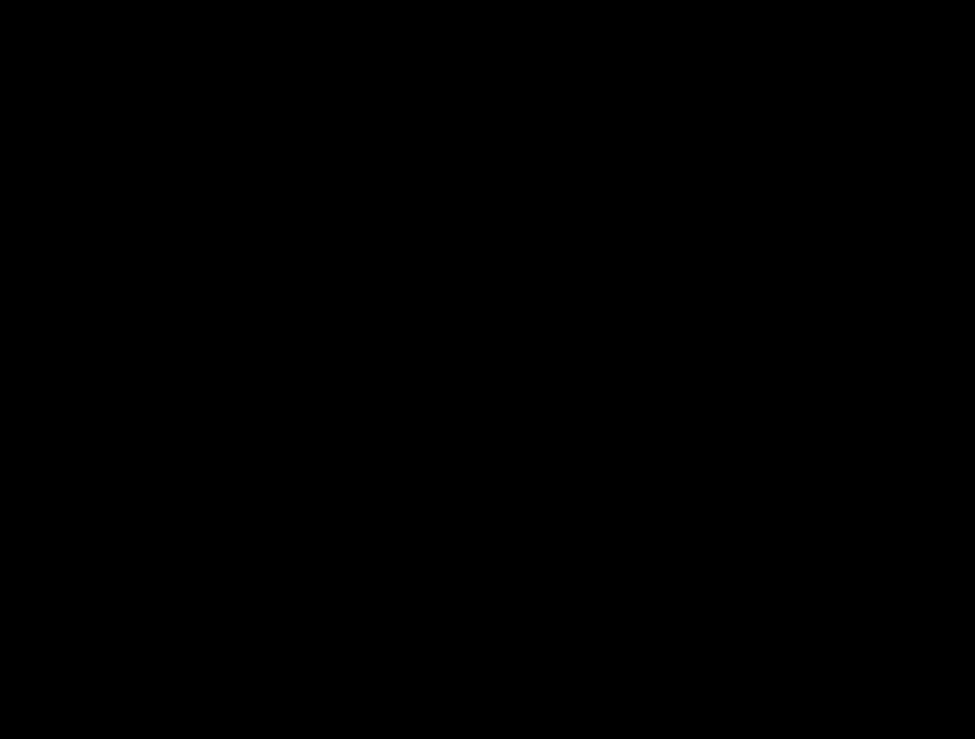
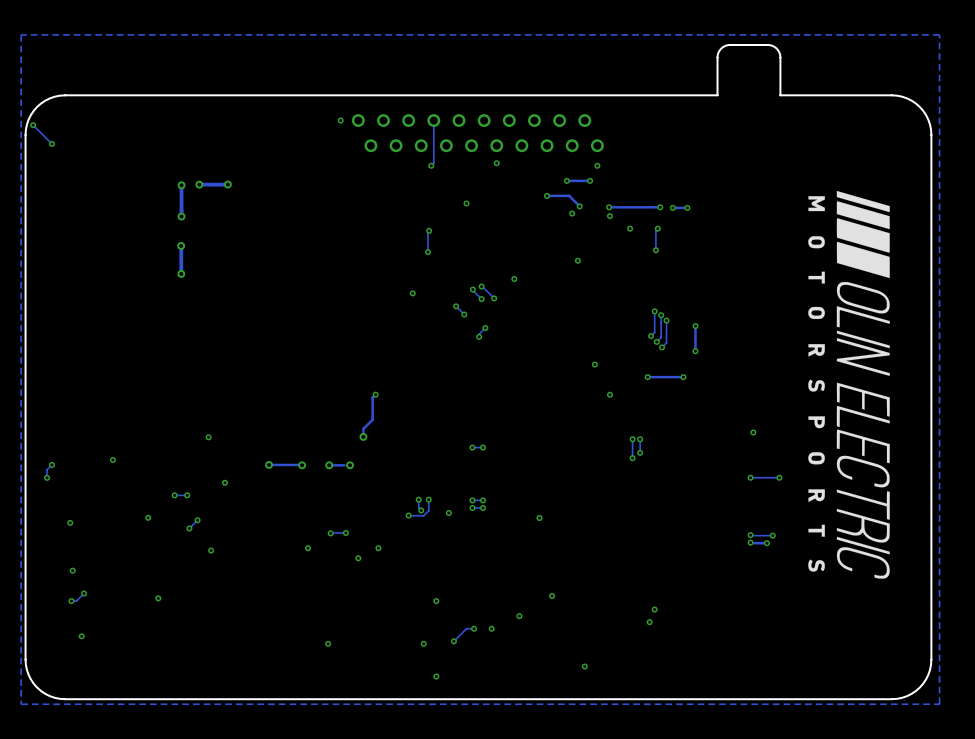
zone outline: none -> (939, 34) (939, 704) (21, 704) (21, 34) (939, 34)
board edge: none -> (767, 44) (728, 45) (721, 48) (717, 55) (717, 95) (65, 95) (50, 98) (41, 103) (30, 115) (25, 134) (25, 659) (28, 674) (33, 683) (50, 696) (65, 699) (891, 699) (902, 697) (915, 691) (928, 674) (931, 659) (930, 124) (919, 106) (911, 100) (896, 95) (780, 95) (779, 54) (775, 47) (767, 44)
via: none -> (340, 120)
track: none -> (433, 120) (433, 163) (431, 165)
track: none -> (33, 125) (51, 143)
via: none -> (33, 125)
part: none -> (477, 133)
via: none -> (51, 143)
via: none -> (496, 163)
via: none -> (431, 165)
via: none -> (597, 165)
via: none -> (566, 180)
track: none -> (590, 180) (566, 180)
via: none -> (590, 180)
via: none -> (199, 184)
track: none -> (227, 184) (199, 184)
via: none -> (227, 184)
track: none -> (181, 185) (181, 216)
via: none -> (181, 185)
drawing: none -> [808, 190, 890, 579]
track: none -> (547, 195) (569, 195) (579, 206)
via: none -> (547, 195)
via: none -> (466, 203)
via: none -> (579, 206)
via: none -> (609, 207)
track: none -> (660, 207) (609, 207)
via: none -> (660, 207)
via: none -> (672, 207)
track: none -> (687, 207) (672, 207)
via: none -> (687, 207)
via: none -> (572, 213)
via: none -> (181, 216)
via: none -> (609, 216)
via: none -> (630, 228)
track: none -> (657, 228) (655, 230) (655, 250)
via: none -> (657, 228)
track: none -> (429, 230) (427, 252)
via: none -> (429, 230)
via: none -> (181, 245)
track: none -> (181, 246) (181, 273)
via: none -> (655, 250)
via: none -> (427, 252)
via: none -> (577, 260)
via: none -> (181, 273)
via: none -> (514, 279)
track: none -> (481, 286) (494, 298)
via: none -> (481, 286)
track: none -> (472, 289) (481, 299)
via: none -> (472, 289)
via: none -> (412, 293)
via: none -> (494, 298)
via: none -> (481, 299)
track: none -> (456, 306) (464, 314)
via: none -> (456, 306)
track: none -> (654, 311) (654, 332) (651, 336)
via: none -> (654, 311)
via: none -> (464, 314)
track: none -> (661, 315) (661, 337) (656, 341)
via: none -> (661, 315)
track: none -> (666, 320) (666, 342) (662, 347)
via: none -> (666, 320)
track: none -> (695, 326) (695, 351)
via: none -> (695, 326)
track: none -> (485, 328) (479, 336)
via: none -> (485, 328)
via: none -> (479, 336)
via: none -> (651, 336)
via: none -> (656, 341)
via: none -> (662, 347)
via: none -> (695, 351)
via: none -> (594, 364)
via: none -> (647, 377)
track: none -> (683, 377) (647, 377)
via: none -> (683, 377)
track: none -> (375, 394) (372, 397) (372, 419) (363, 428) (363, 436)
via: none -> (375, 394)
via: none -> (609, 394)
via: none -> (753, 432)
via: none -> (363, 436)
via: none -> (208, 437)
track: none -> (632, 439) (632, 458)
via: none -> (632, 439)
track: none -> (640, 439) (640, 452)
via: none -> (640, 439)
via: none -> (472, 447)
track: none -> (483, 447) (472, 447)
via: none -> (483, 447)
via: none -> (640, 452)
via: none -> (632, 458)
via: none -> (112, 459)
track: none -> (51, 464) (47, 469) (47, 477)
via: none -> (51, 464)
track: none -> (269, 464) (302, 465)
via: none -> (269, 464)
via: none -> (302, 465)
via: none -> (329, 465)
track: none -> (344, 465) (329, 465)
via: none -> (350, 465)
via: none -> (47, 477)
via: none -> (750, 477)
track: none -> (779, 477) (750, 477)
via: none -> (779, 477)
via: none -> (224, 482)
via: none -> (174, 495)
track: none -> (187, 495) (174, 495)
via: none -> (187, 495)
track: none -> (418, 499) (418, 507) (421, 510)
via: none -> (418, 499)
track: none -> (428, 499) (428, 510) (423, 515) (408, 515)
via: none -> (428, 499)
via: none -> (472, 500)
track: none -> (483, 500) (472, 500)
via: none -> (483, 500)
via: none -> (472, 507)
track: none -> (483, 507) (472, 507)
via: none -> (483, 507)
via: none -> (421, 510)
via: none -> (448, 513)
via: none -> (408, 515)
via: none -> (148, 517)
via: none -> (539, 518)
track: none -> (197, 520) (189, 528)
via: none -> (197, 520)
via: none -> (70, 522)
via: none -> (189, 528)
track: none -> (345, 532) (330, 533)
via: none -> (345, 532)
via: none -> (330, 533)
track: none -> (750, 535) (772, 535)
via: none -> (750, 535)
via: none -> (772, 535)
via: none -> (750, 542)
track: none -> (753, 542) (766, 543)
via: none -> (766, 543)
via: none -> (308, 548)
via: none -> (378, 548)
via: none -> (211, 550)
via: none -> (358, 558)
via: none -> (72, 570)
track: none -> (84, 593) (76, 601) (71, 601)
via: none -> (84, 593)
via: none -> (552, 596)
via: none -> (158, 598)
via: none -> (71, 601)
via: none -> (436, 601)
via: none -> (654, 609)
via: none -> (519, 616)
via: none -> (649, 622)
track: none -> (474, 628) (466, 628) (453, 641)
via: none -> (474, 628)
via: none -> (491, 628)
via: none -> (81, 636)
via: none -> (453, 641)
via: none -> (328, 643)
via: none -> (423, 643)
via: none -> (584, 666)
via: none -> (436, 676)

